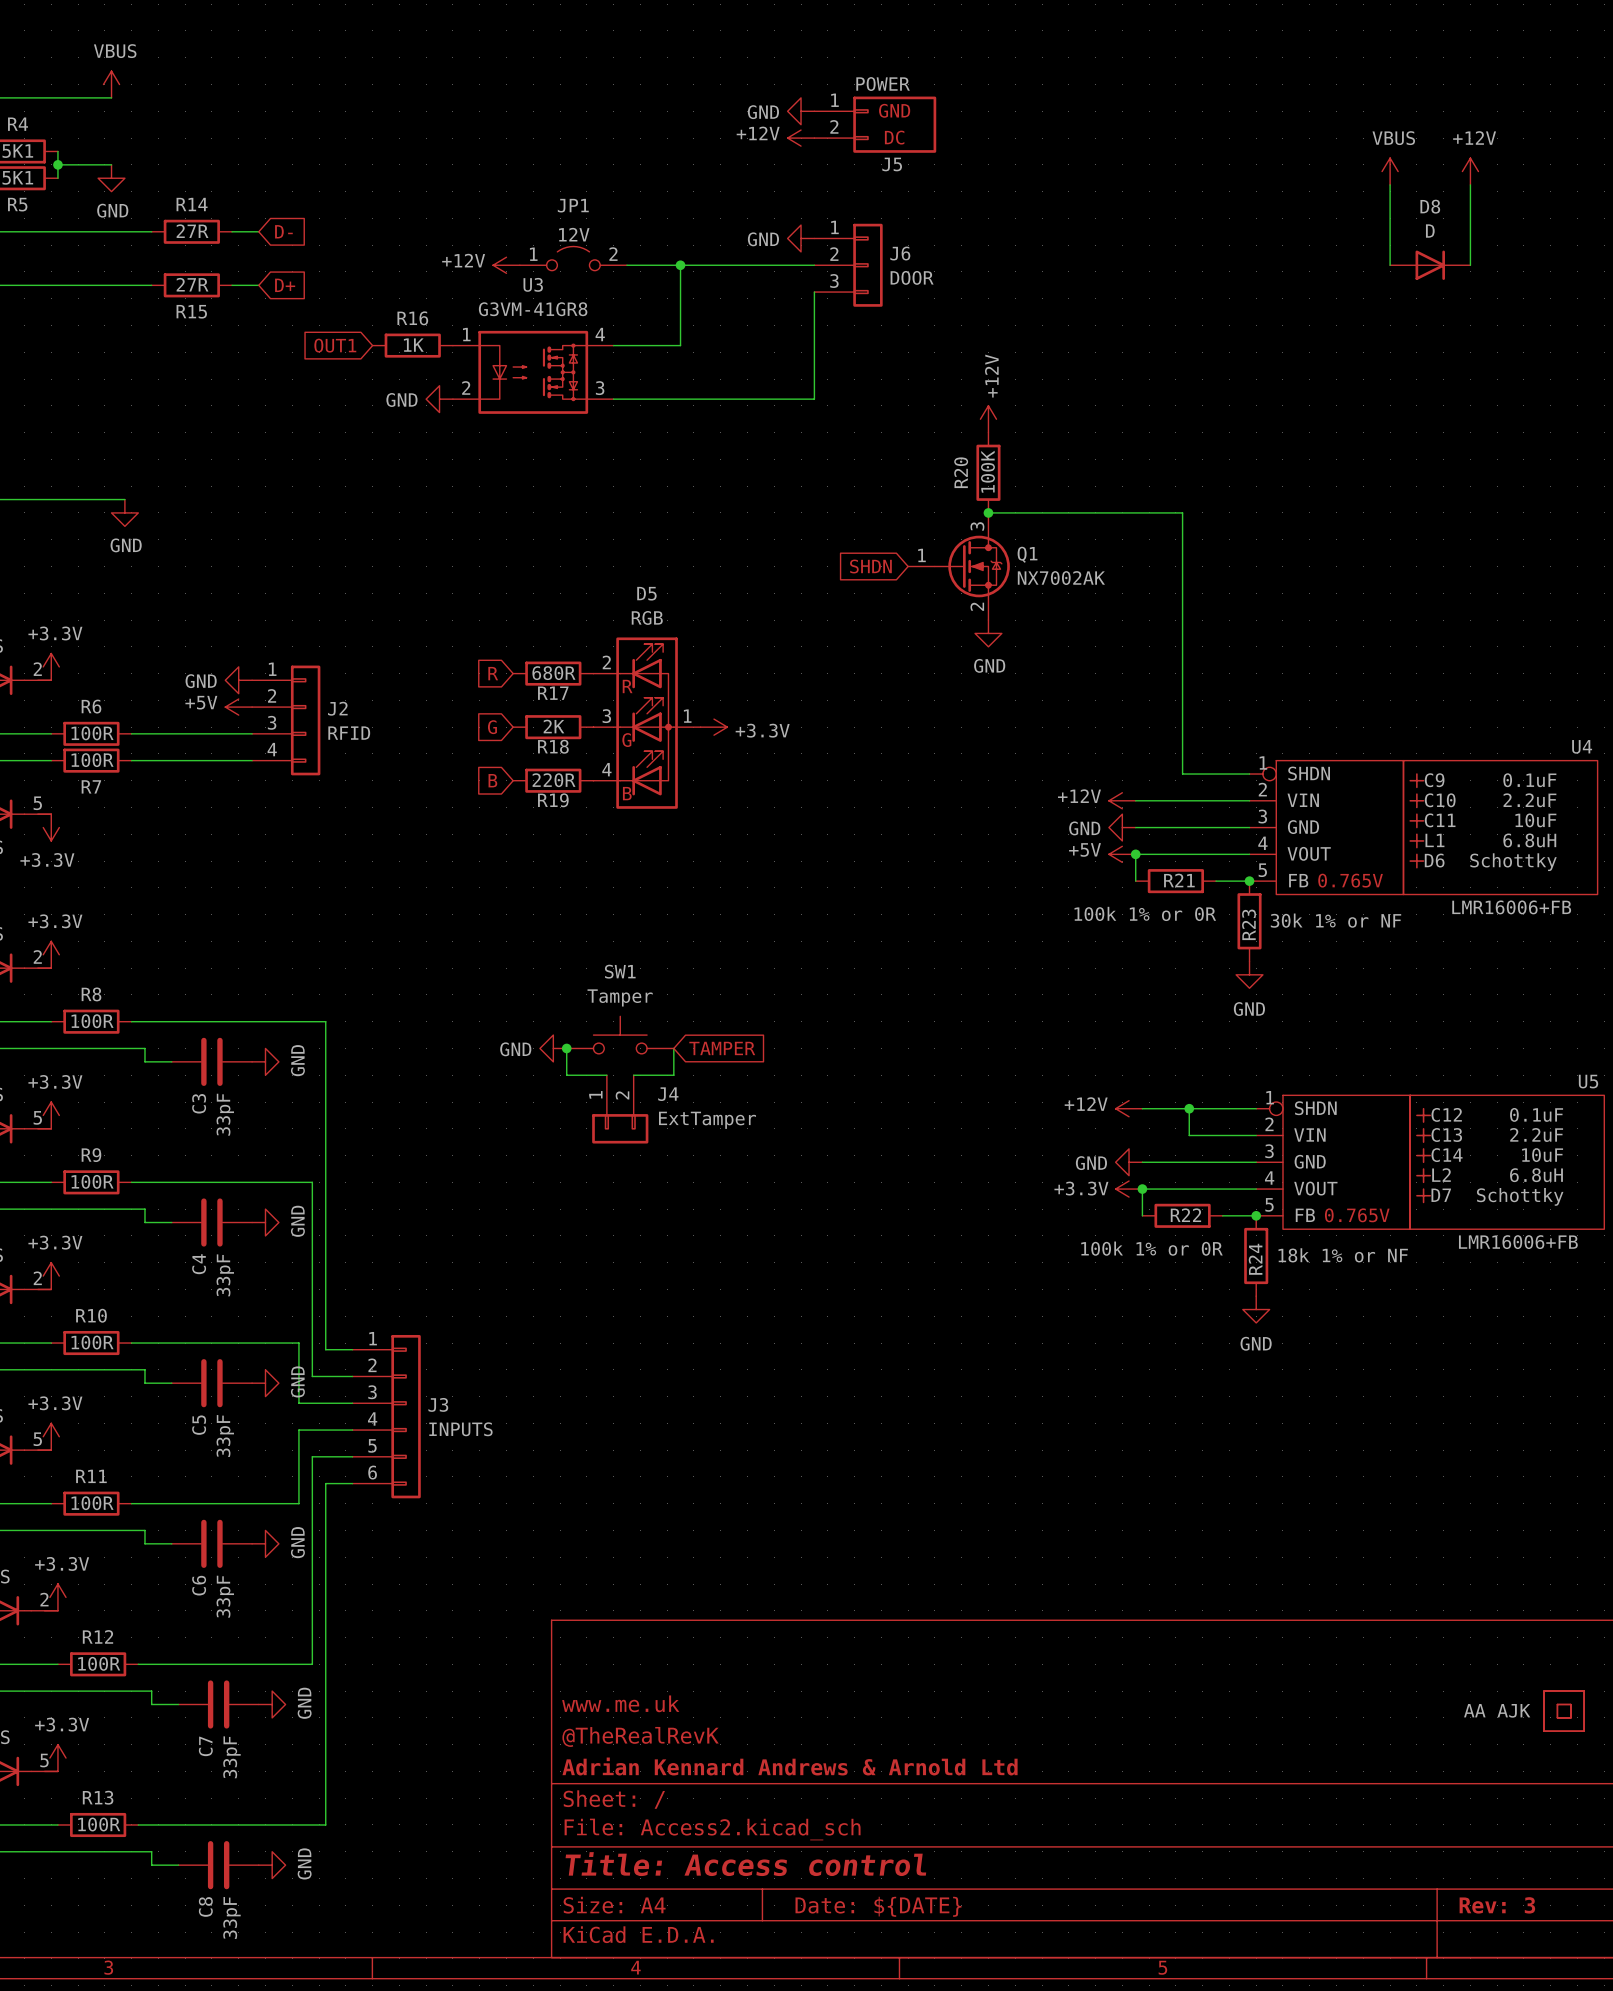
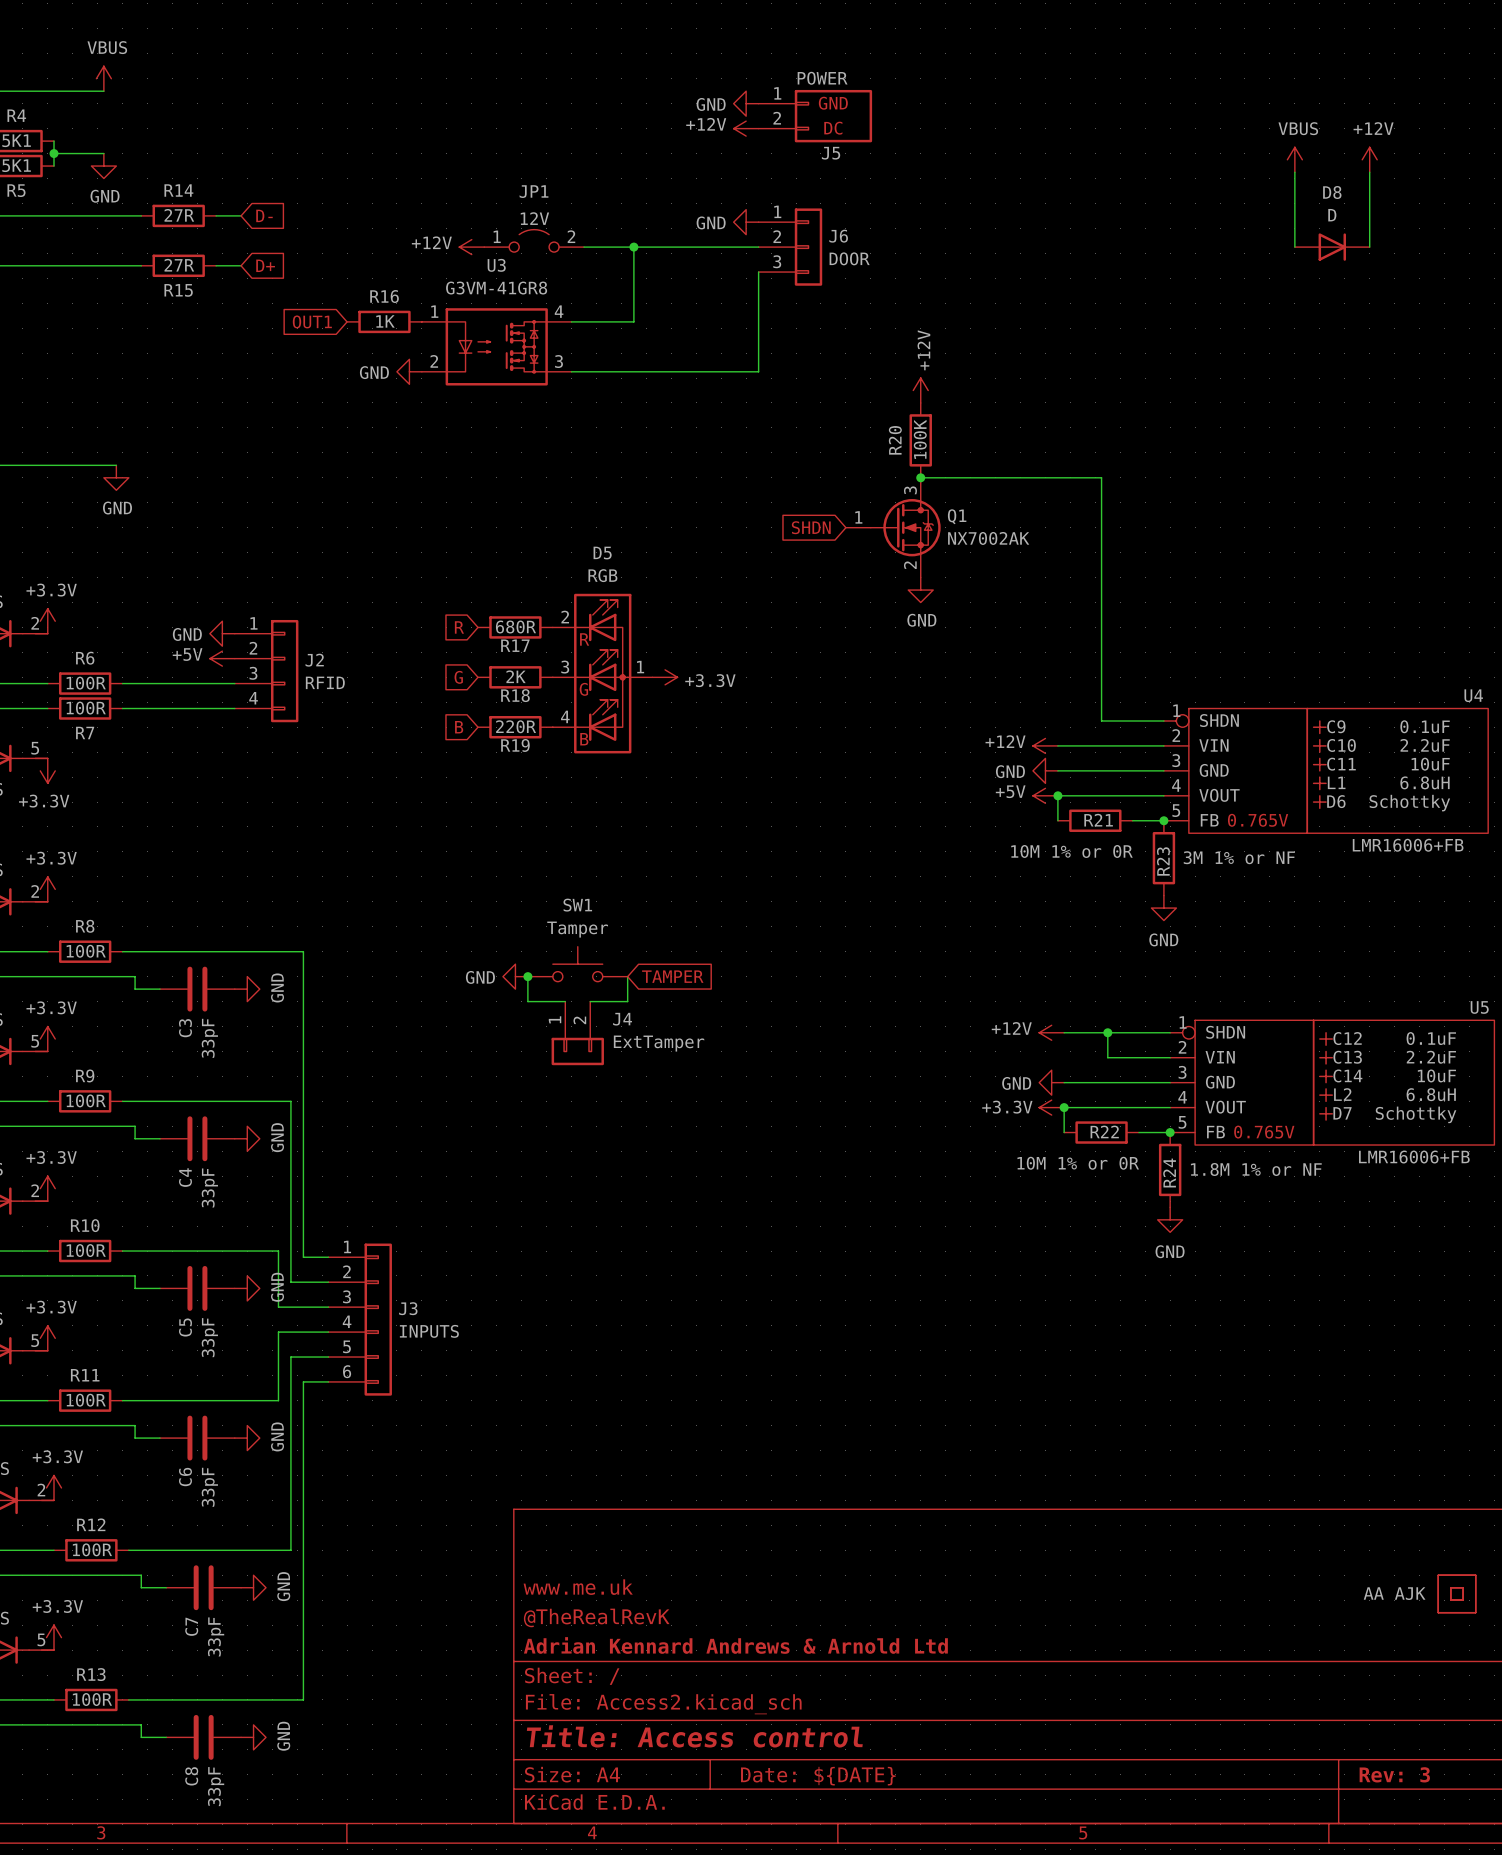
R21 value: 100k 1% or 0R (1145, 913) -> 10M 1% or 0R (1071, 851)
R23 value: 30k 1% or NF (1336, 920) -> 3M 1% or NF (1239, 857)
R22 value: 100k 1% or 0R (1151, 1248) -> 10M 1% or 0R (1078, 1163)
R24 value: 18k 1% or NF (1343, 1255) -> 1.8M 1% or NF (1256, 1169)

